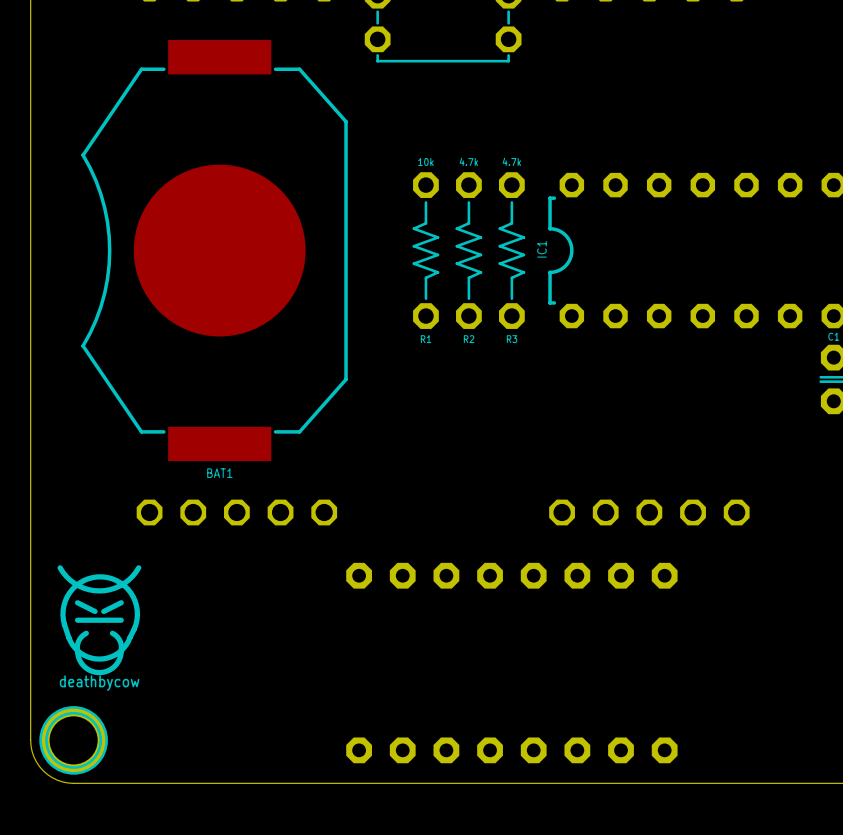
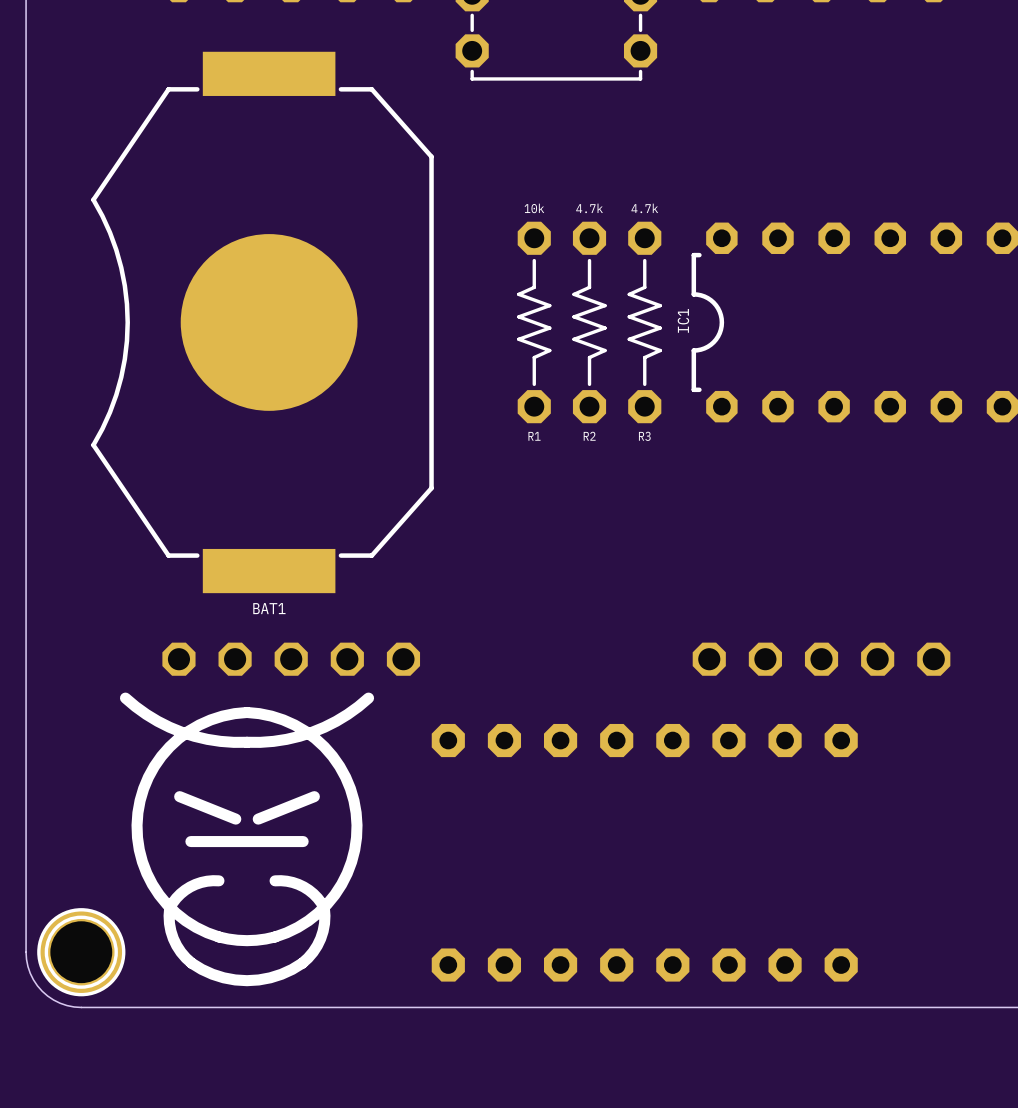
BAT1 footprint: [81, 40, 348, 462] -> [91, 51, 434, 594]
drawing: none -> [119, 692, 375, 987]
drawing: [57, 565, 142, 676] -> none

